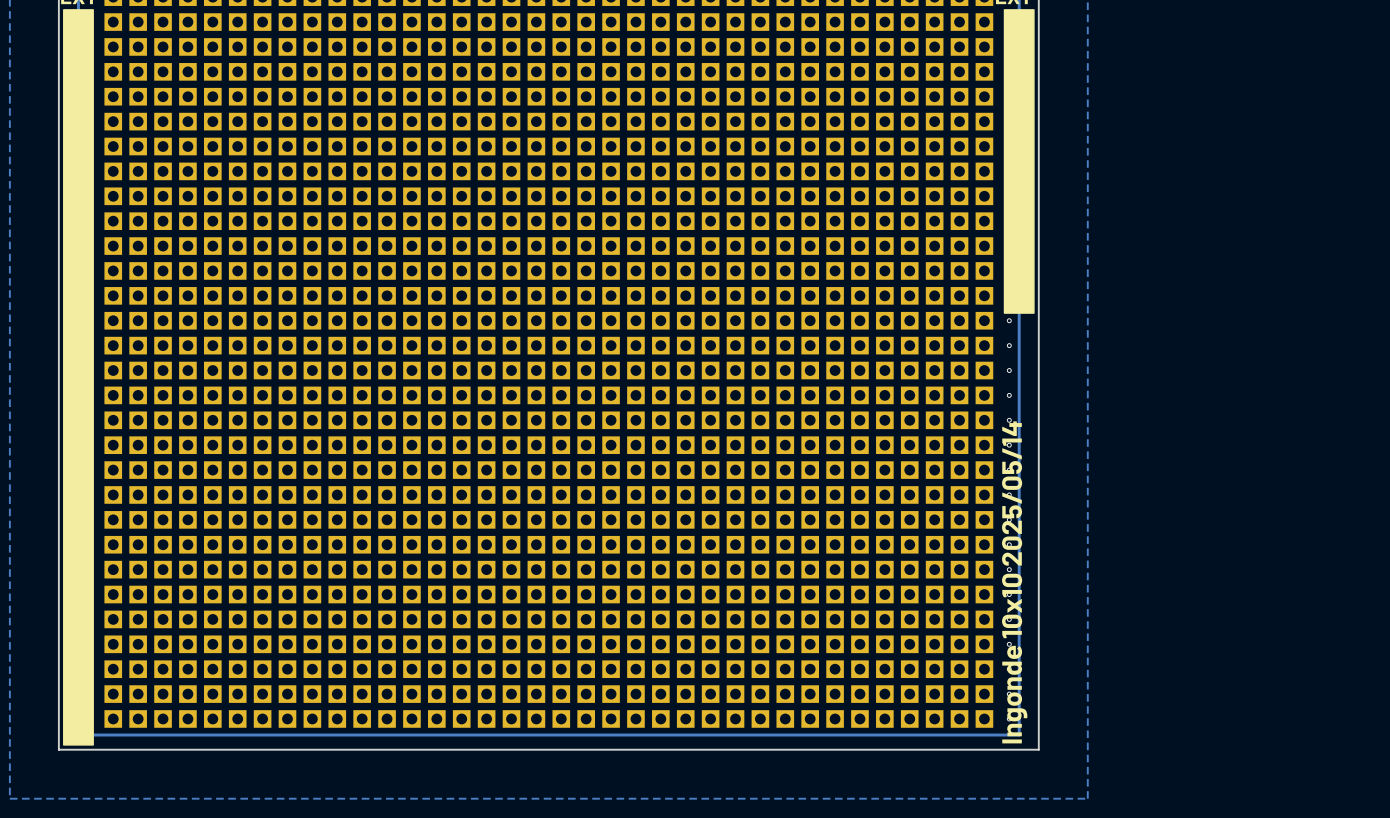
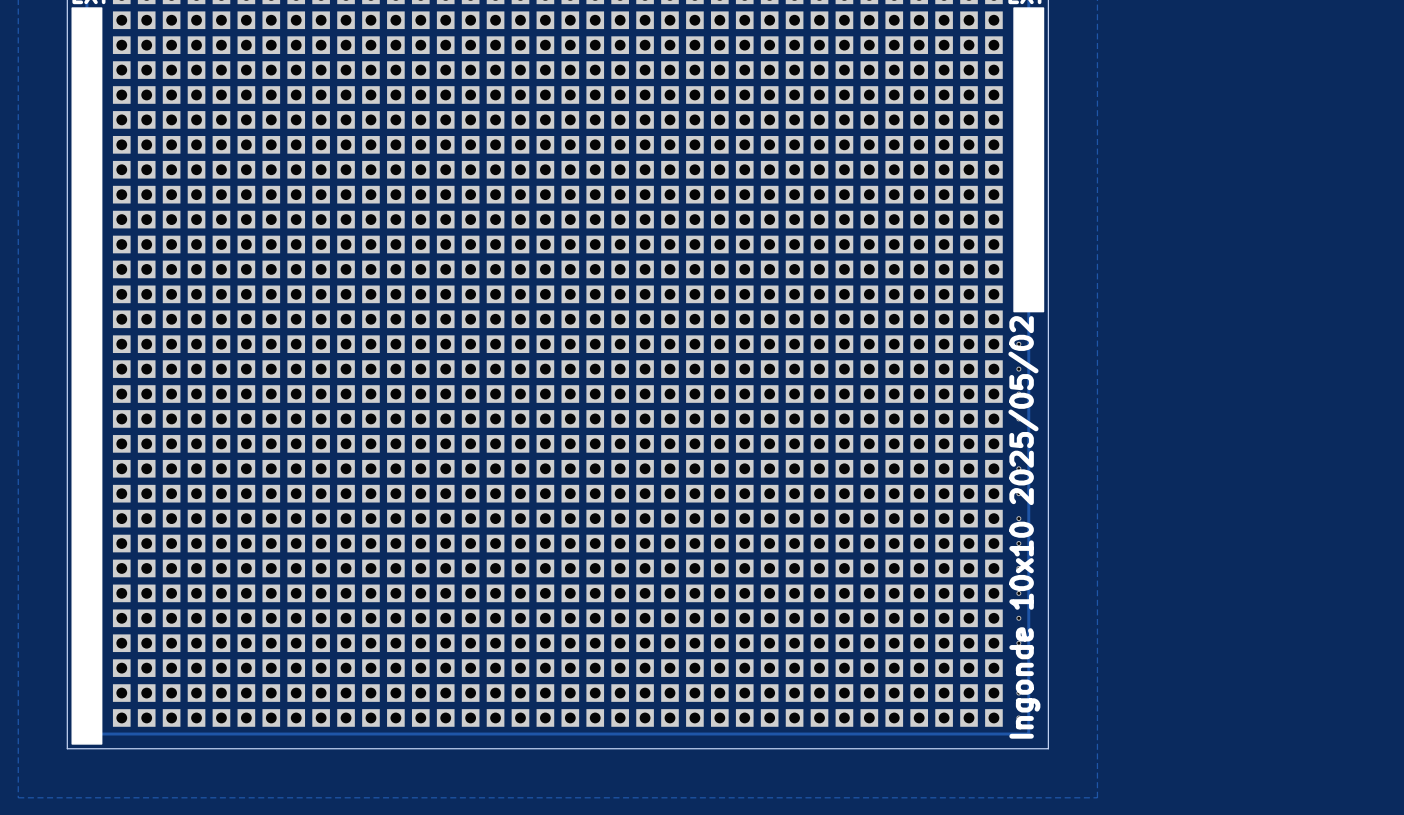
text: Ingonde 10x10 2025/05/14 (1014, 582) -> Ingonde 10x10 2025/05/02 (1024, 527)

